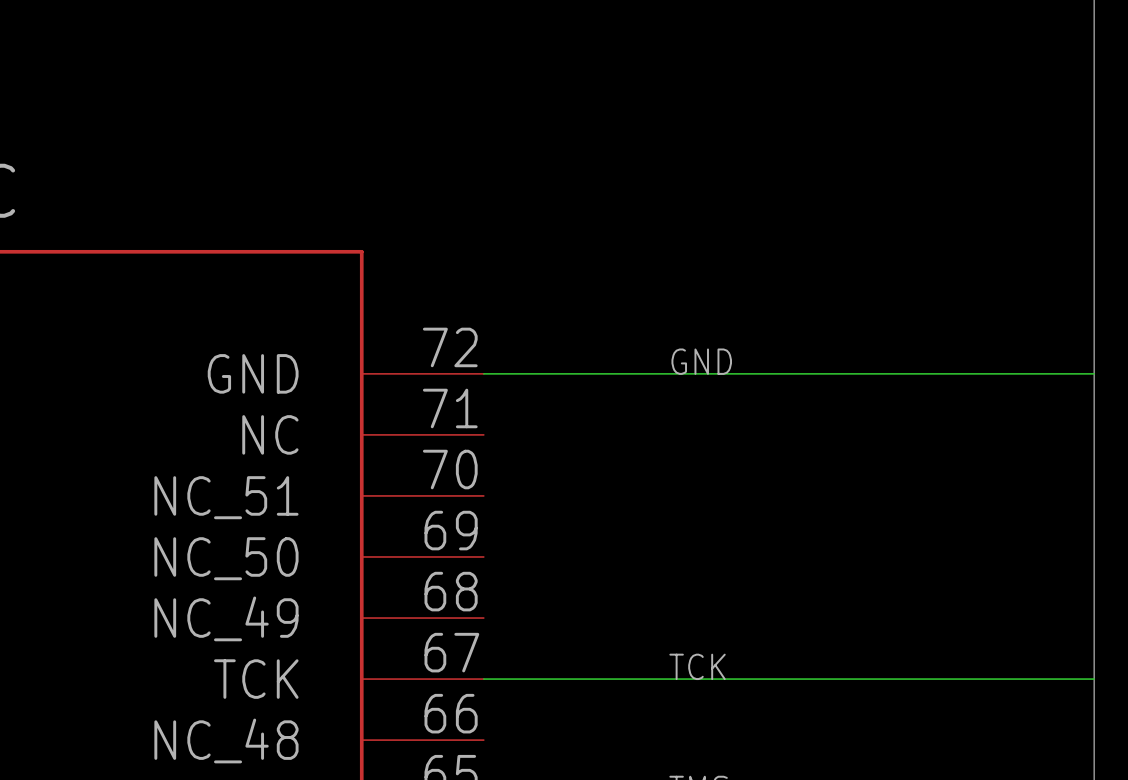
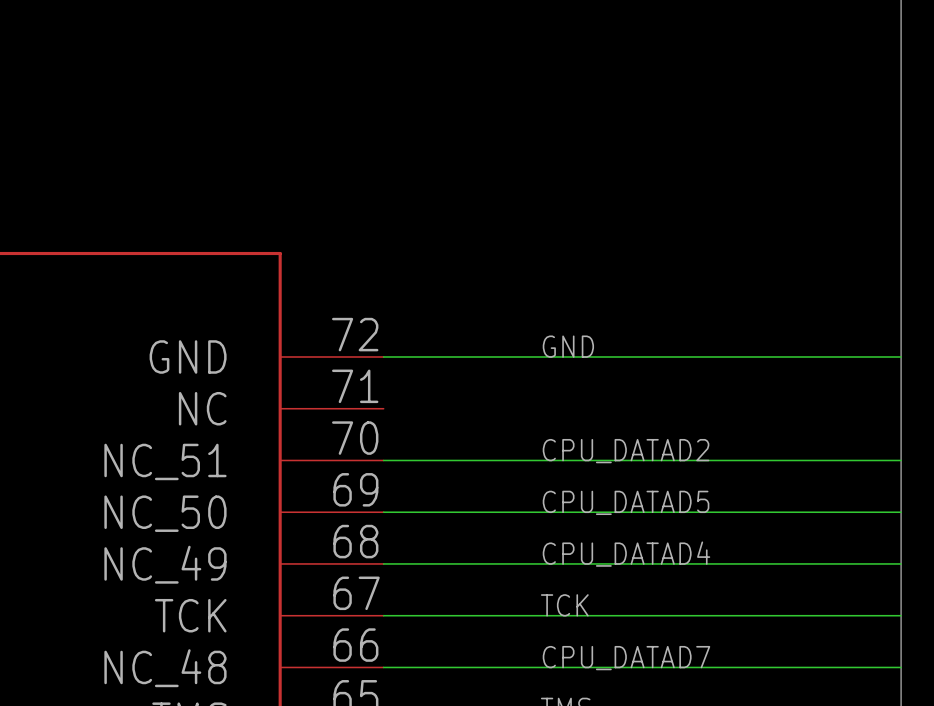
label: none -> CPU_DATAD2 (626, 451)
wire: none -> (383, 460) (901, 460)
label: none -> CPU_DATAD5 (626, 502)
wire: none -> (383, 512) (901, 512)
label: none -> CPU_DATAD4 (626, 554)
wire: none -> (383, 563) (901, 563)
label: none -> CPU_DATAD7 (626, 658)
wire: none -> (383, 667) (901, 667)

